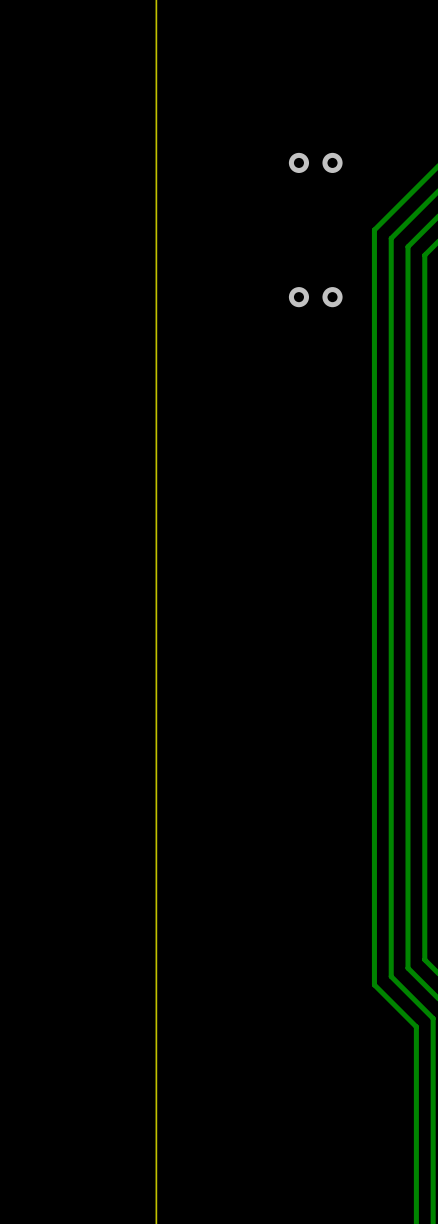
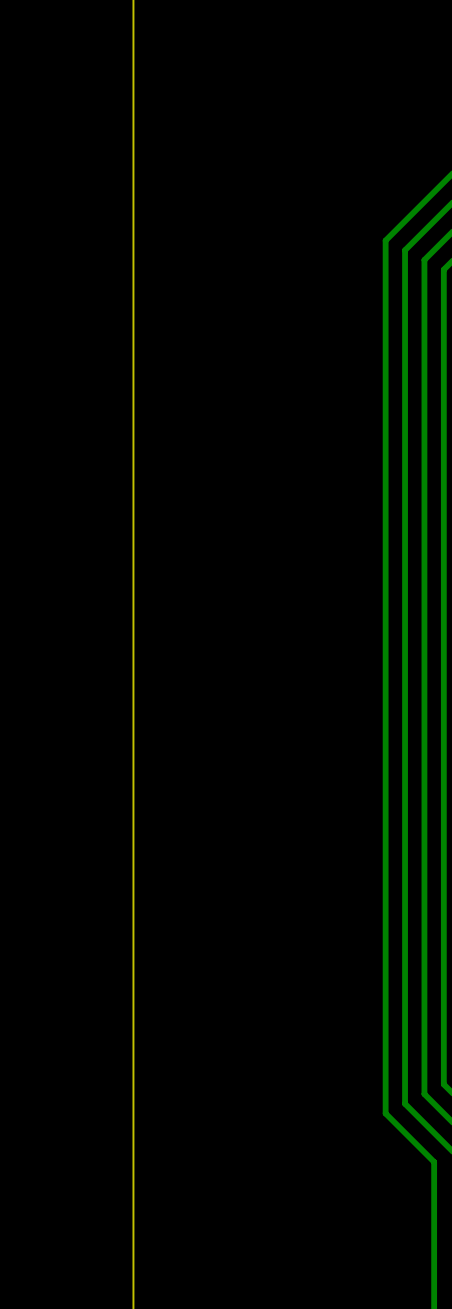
via: (298, 162) -> none
via: (332, 162) -> none
via: (298, 297) -> none
via: (332, 297) -> none

